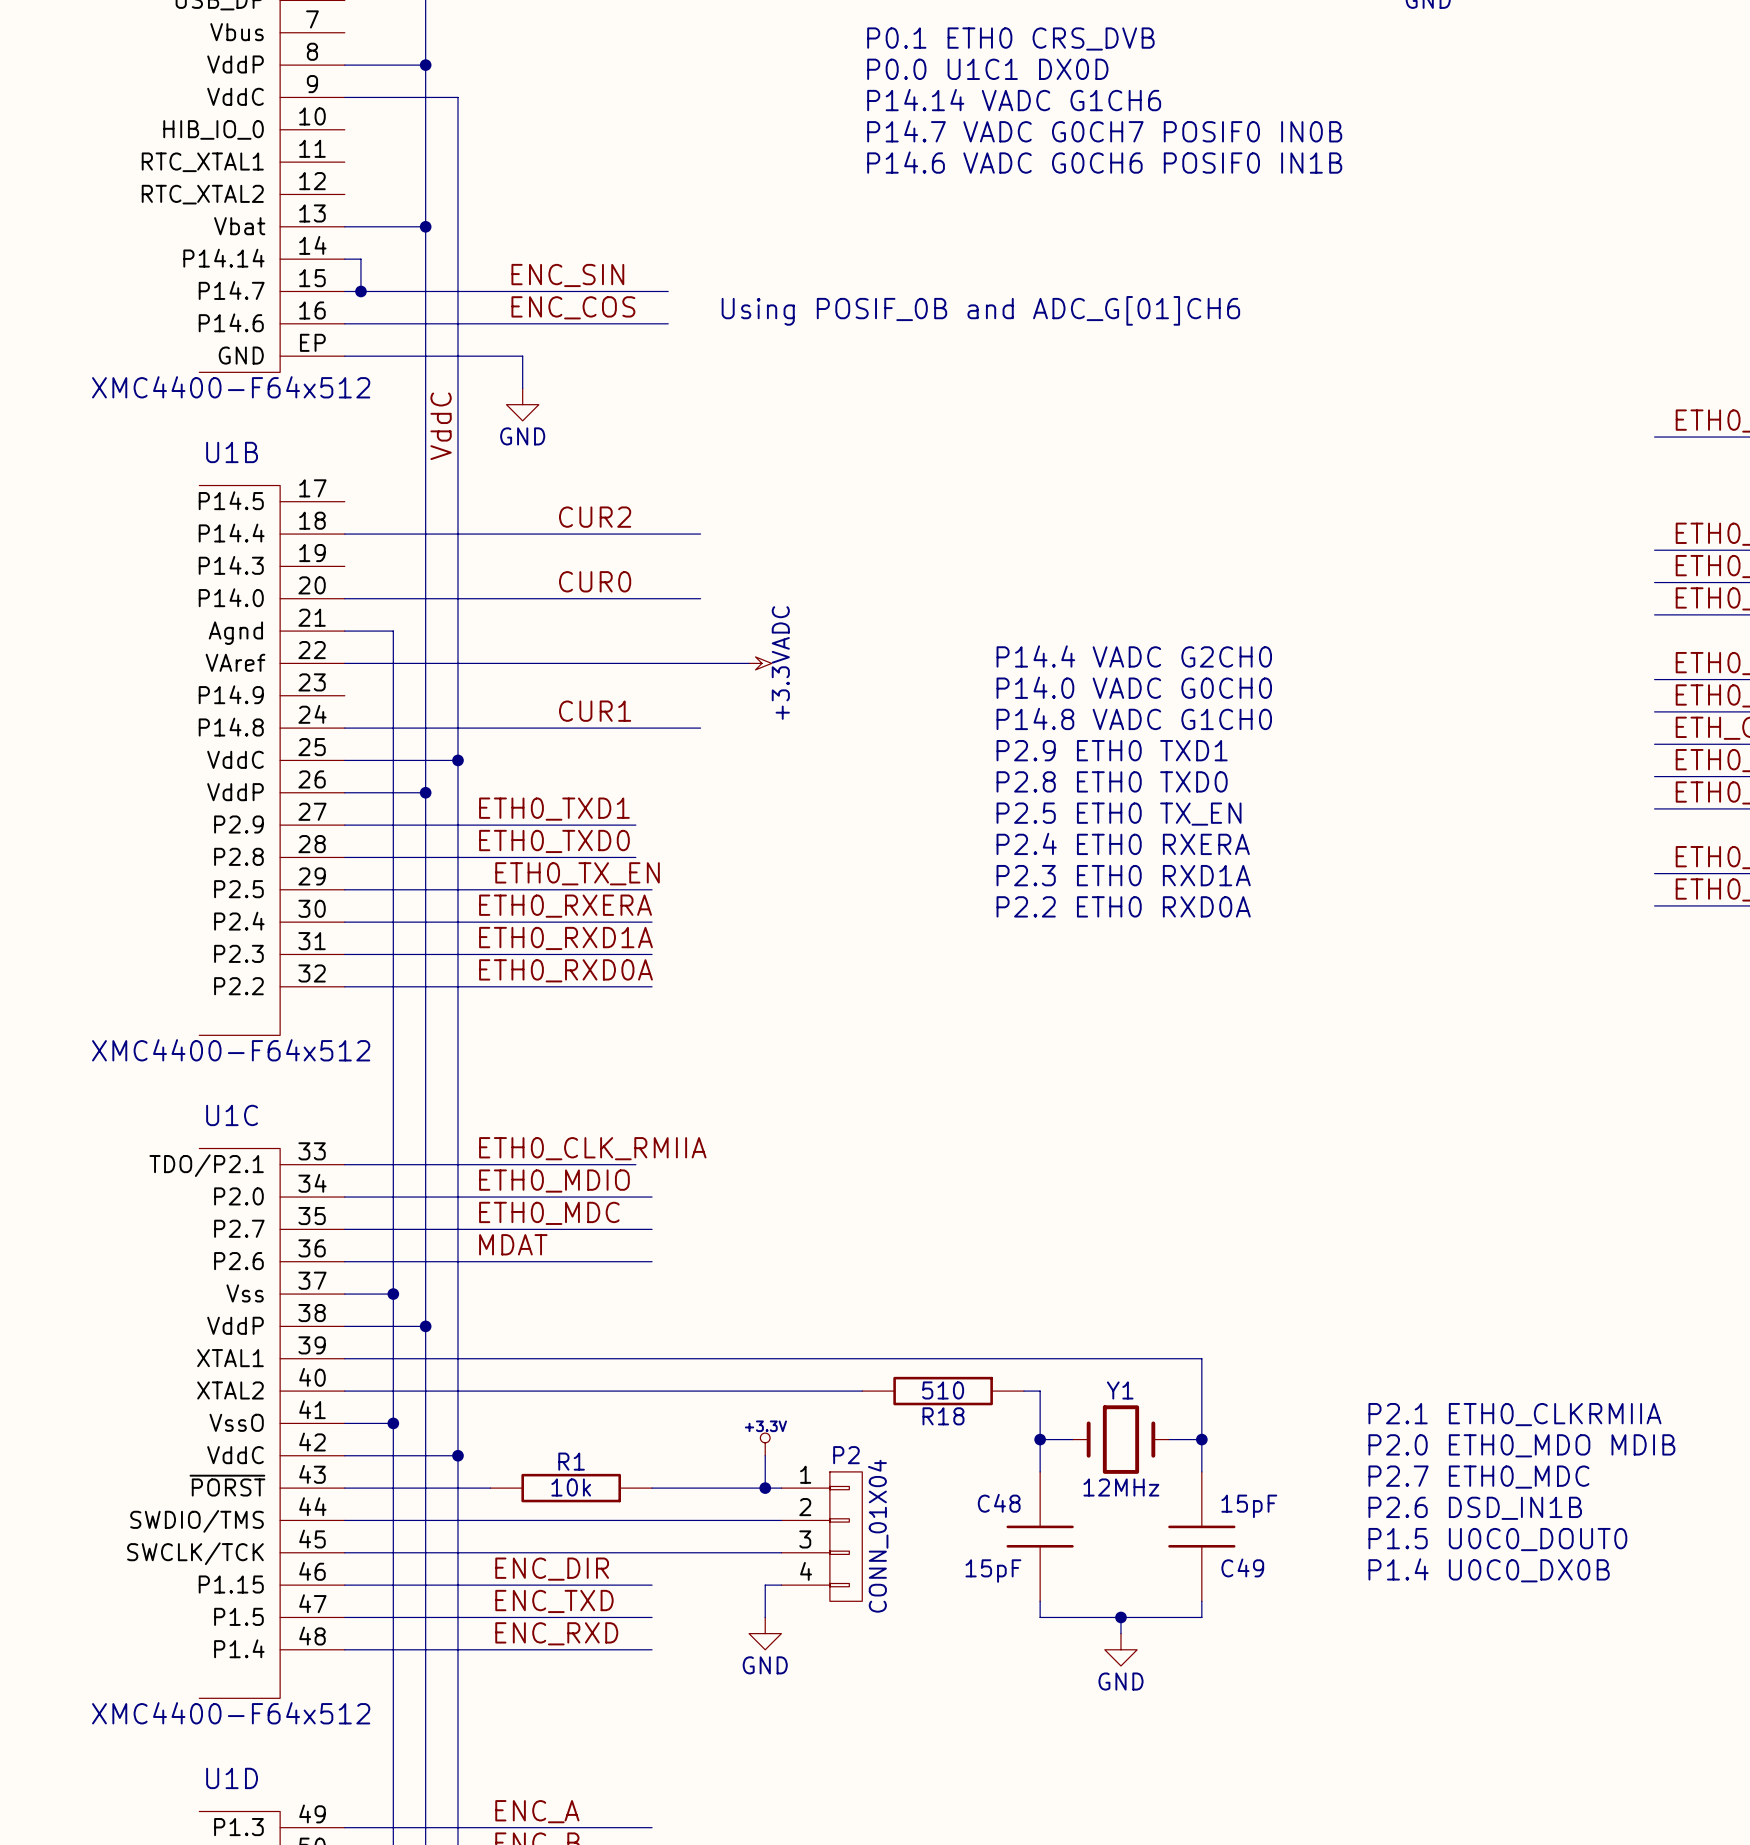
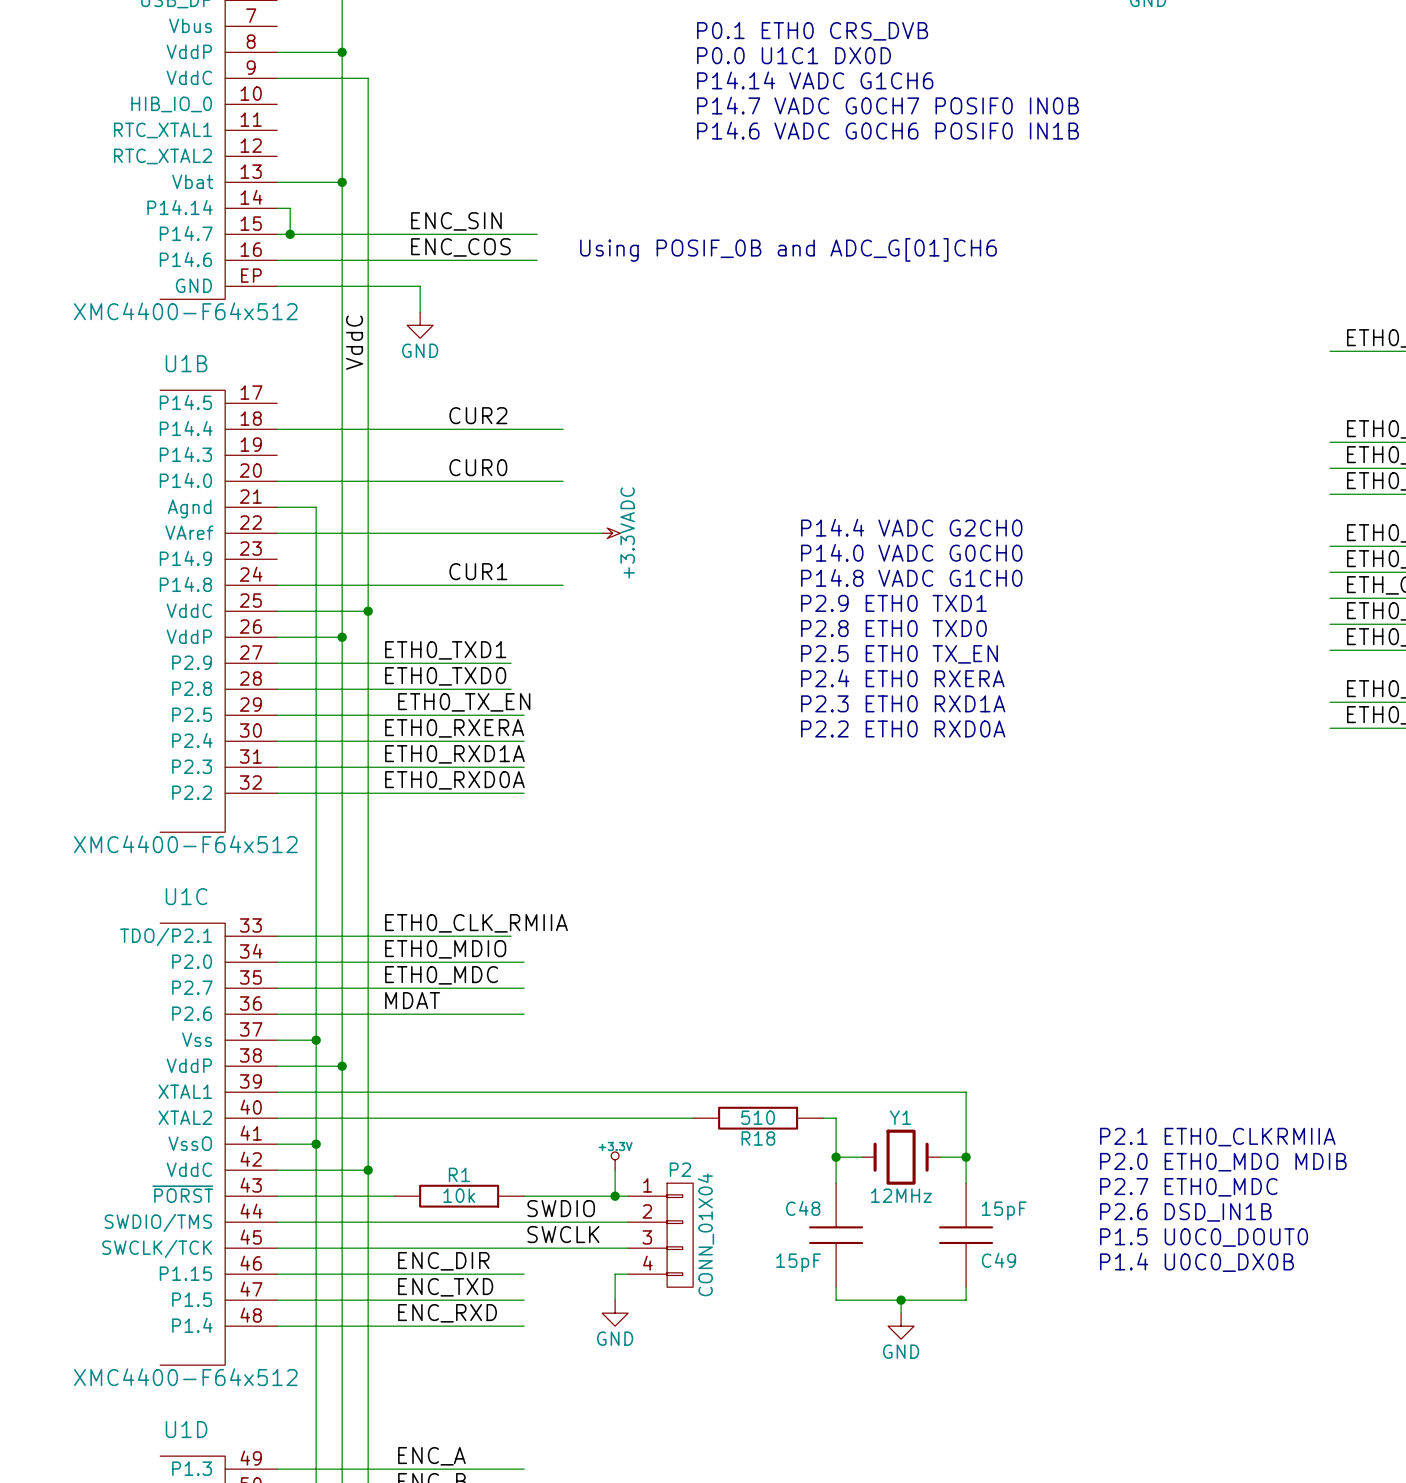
label: none -> SWDIO (561, 1208)
label: none -> SWCLK (563, 1234)

